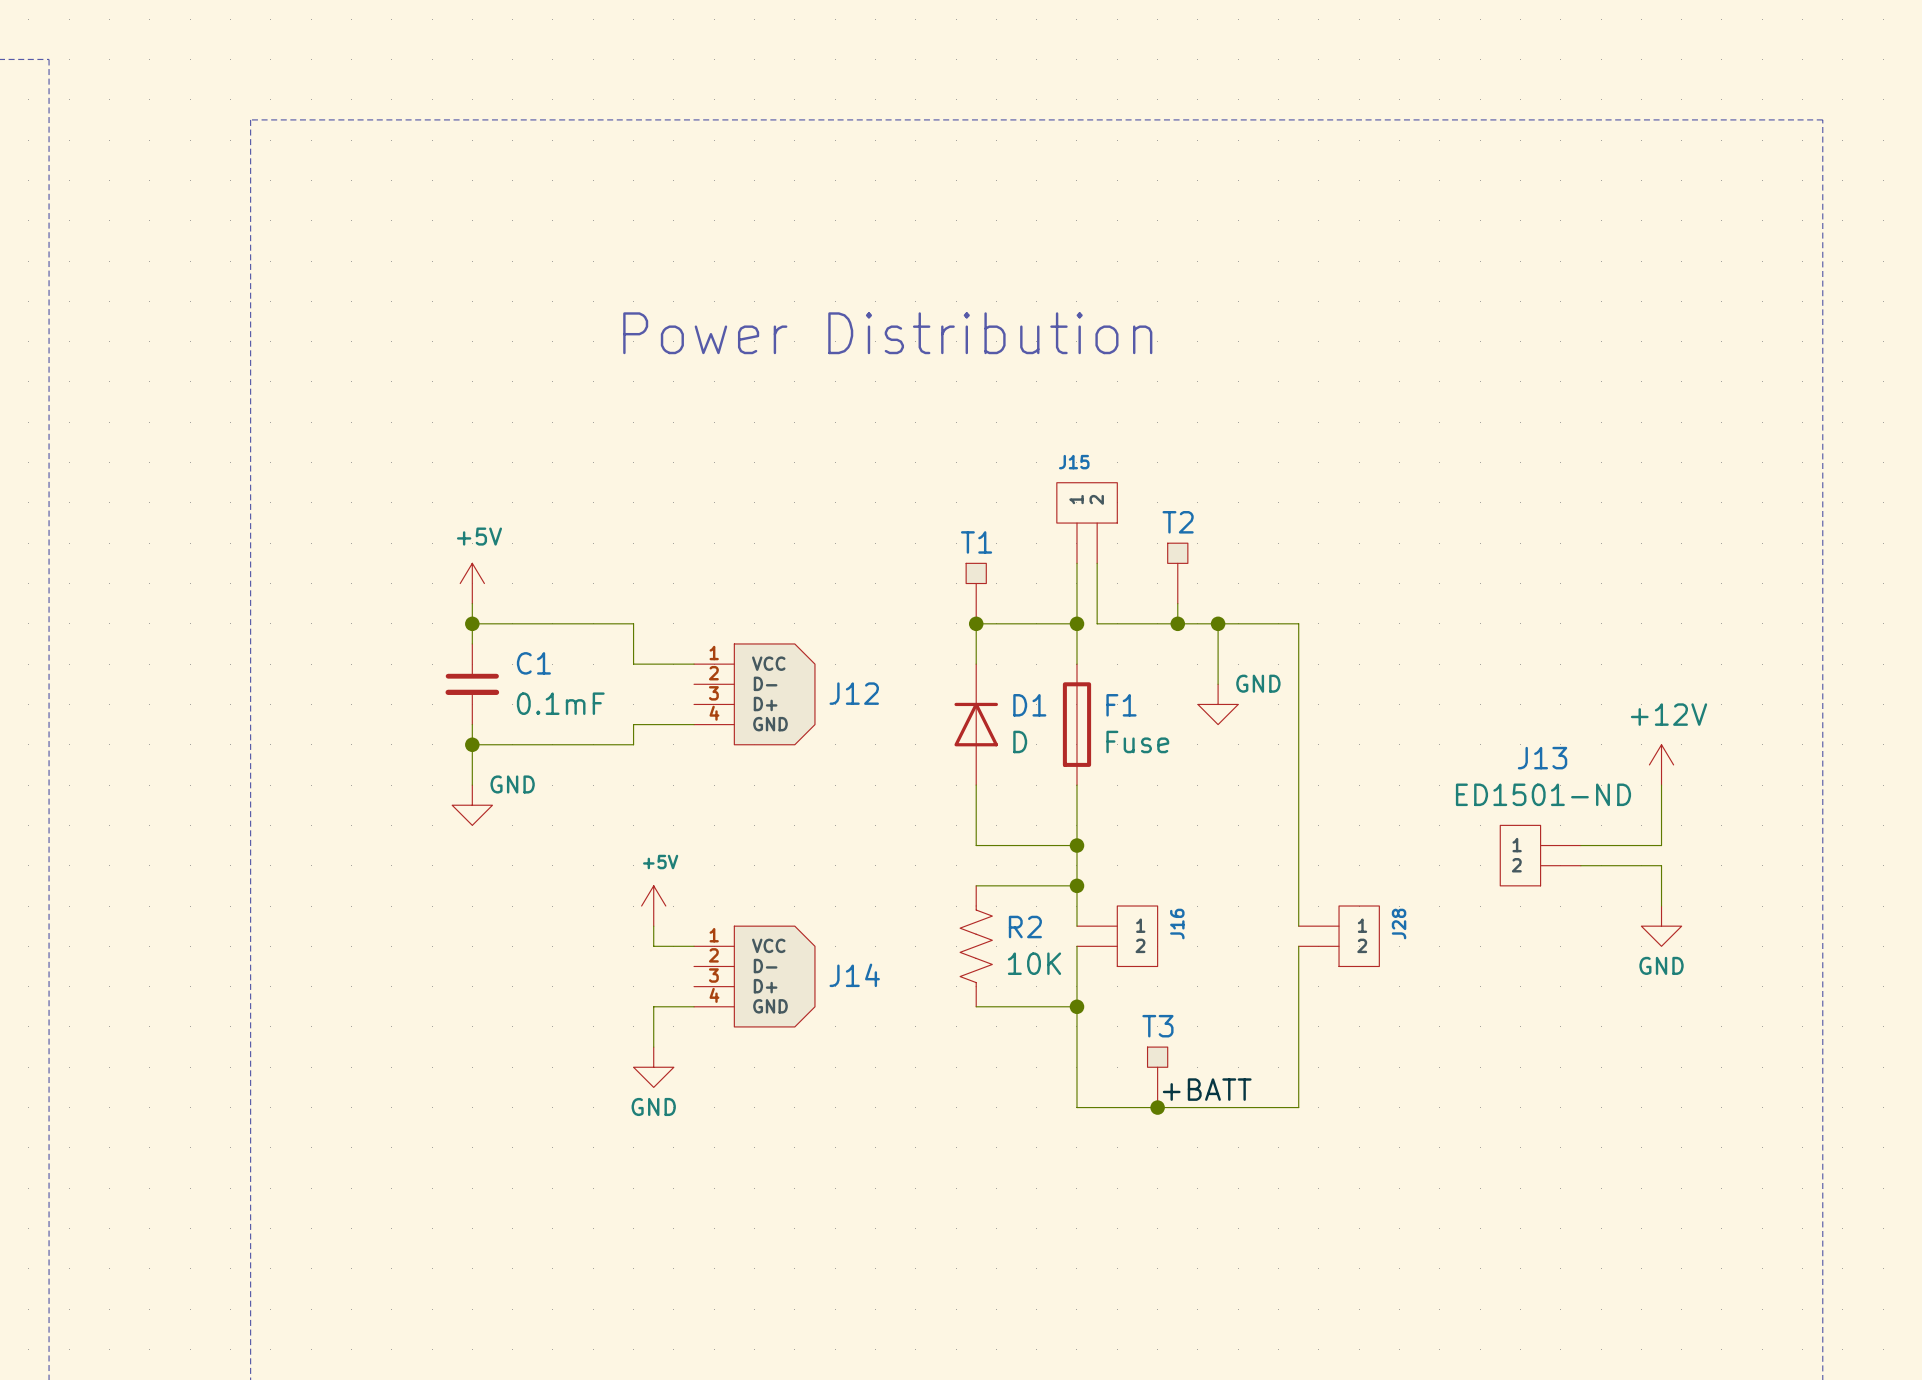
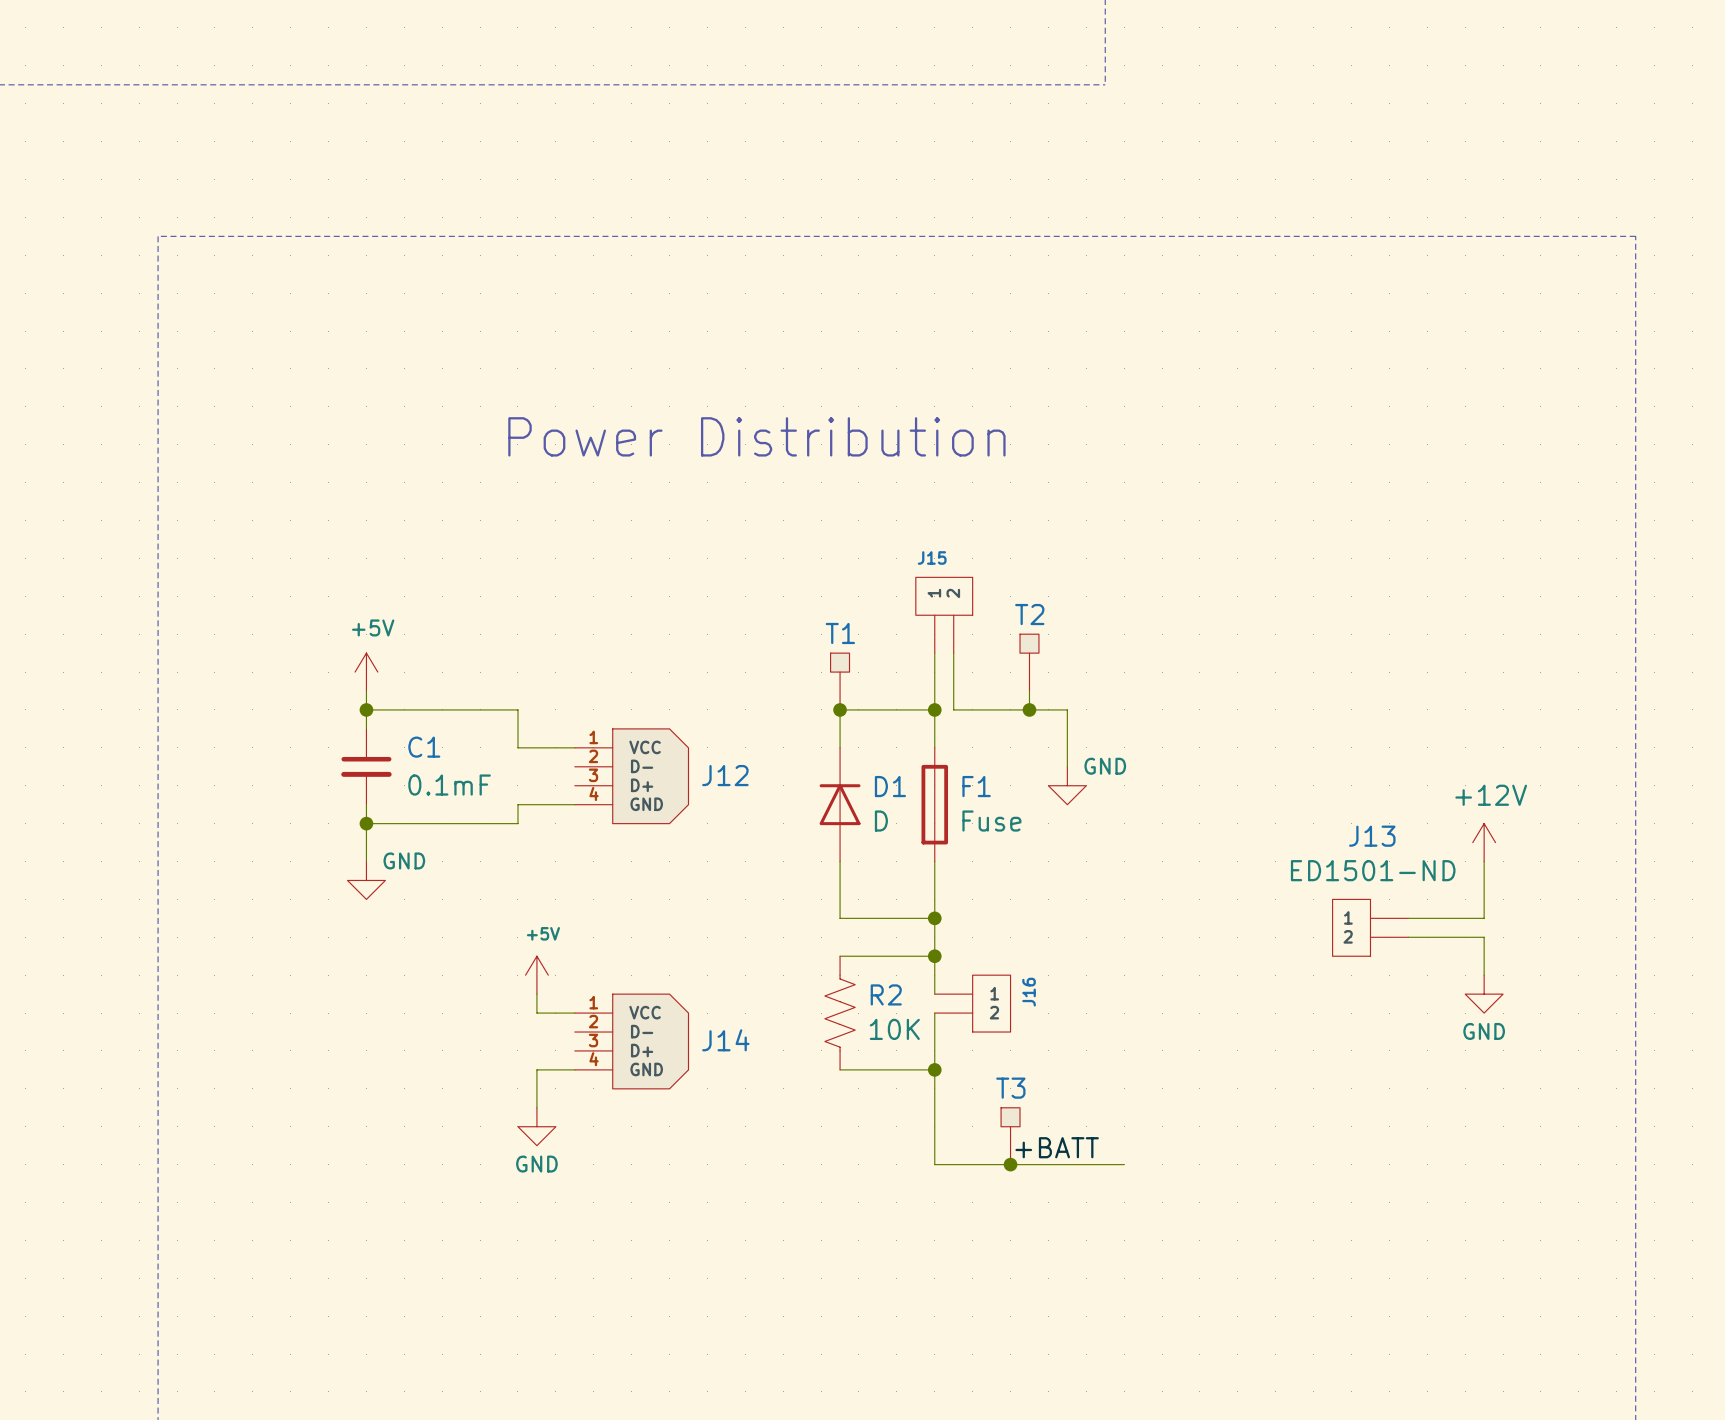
wire: (1218, 623) (1298, 623) (1298, 926) -> none
junction: (1218, 623) -> none
J28: (1339, 936) -> none
wire: (1298, 946) (1298, 1107) (1278, 1107) -> none

